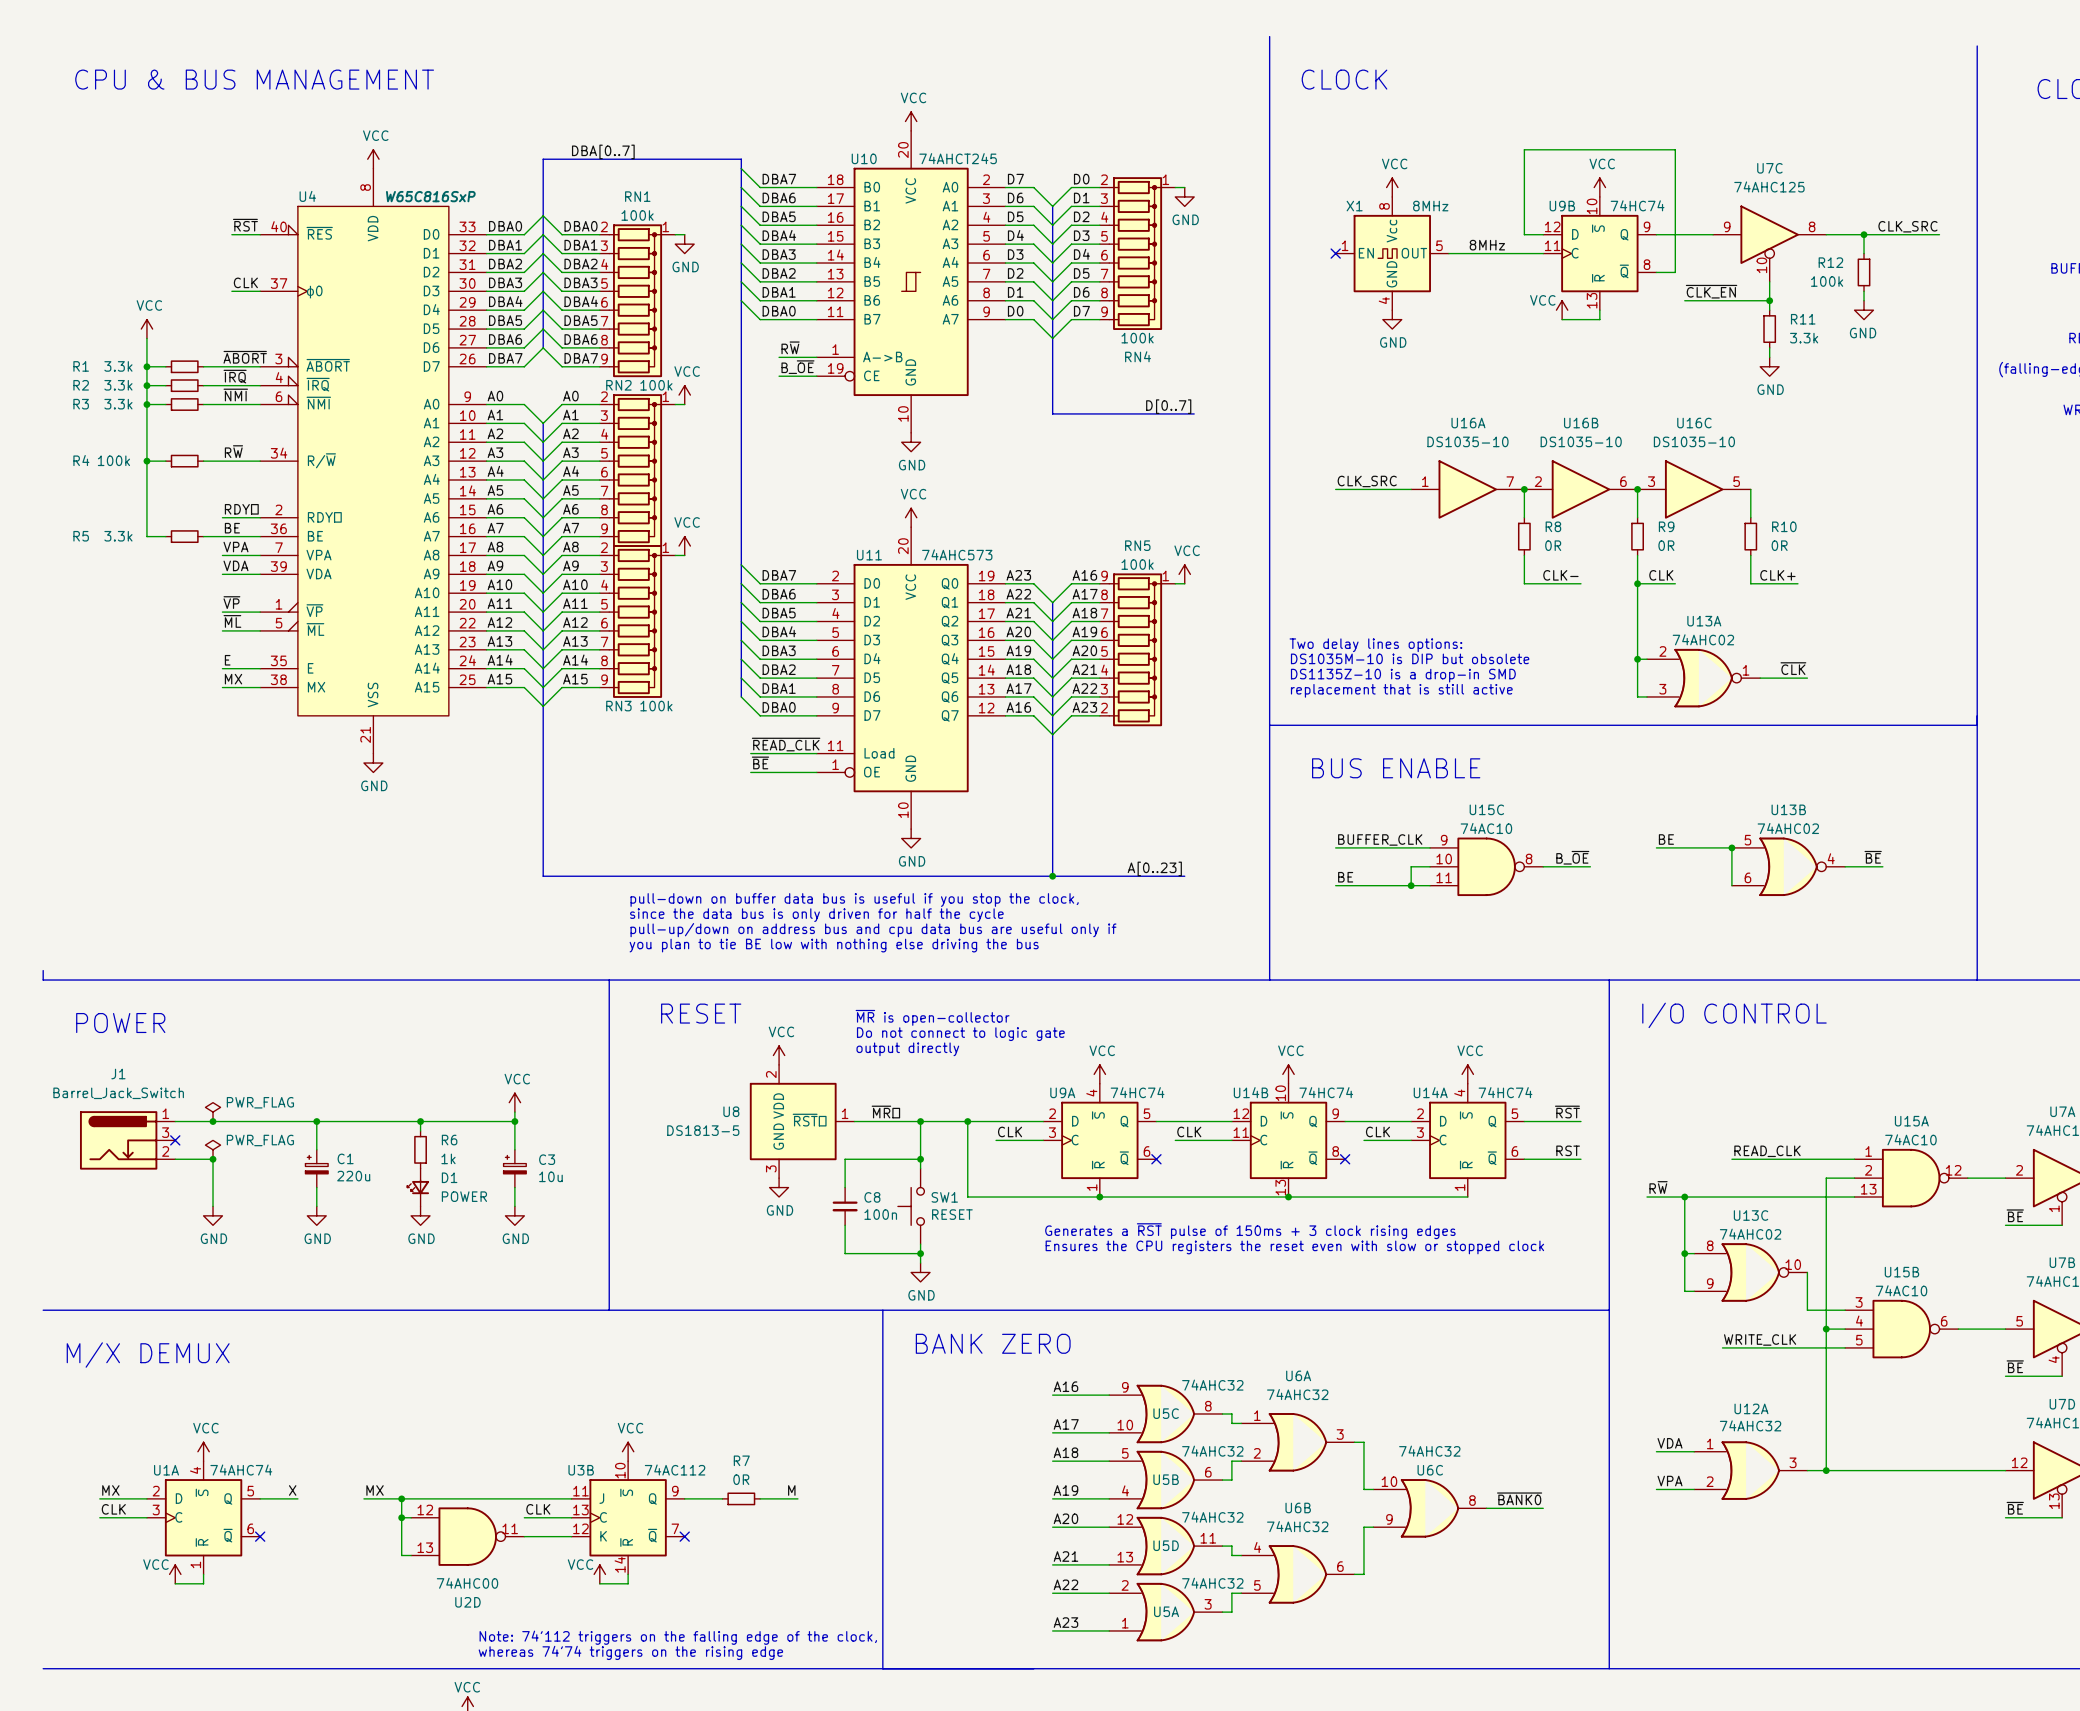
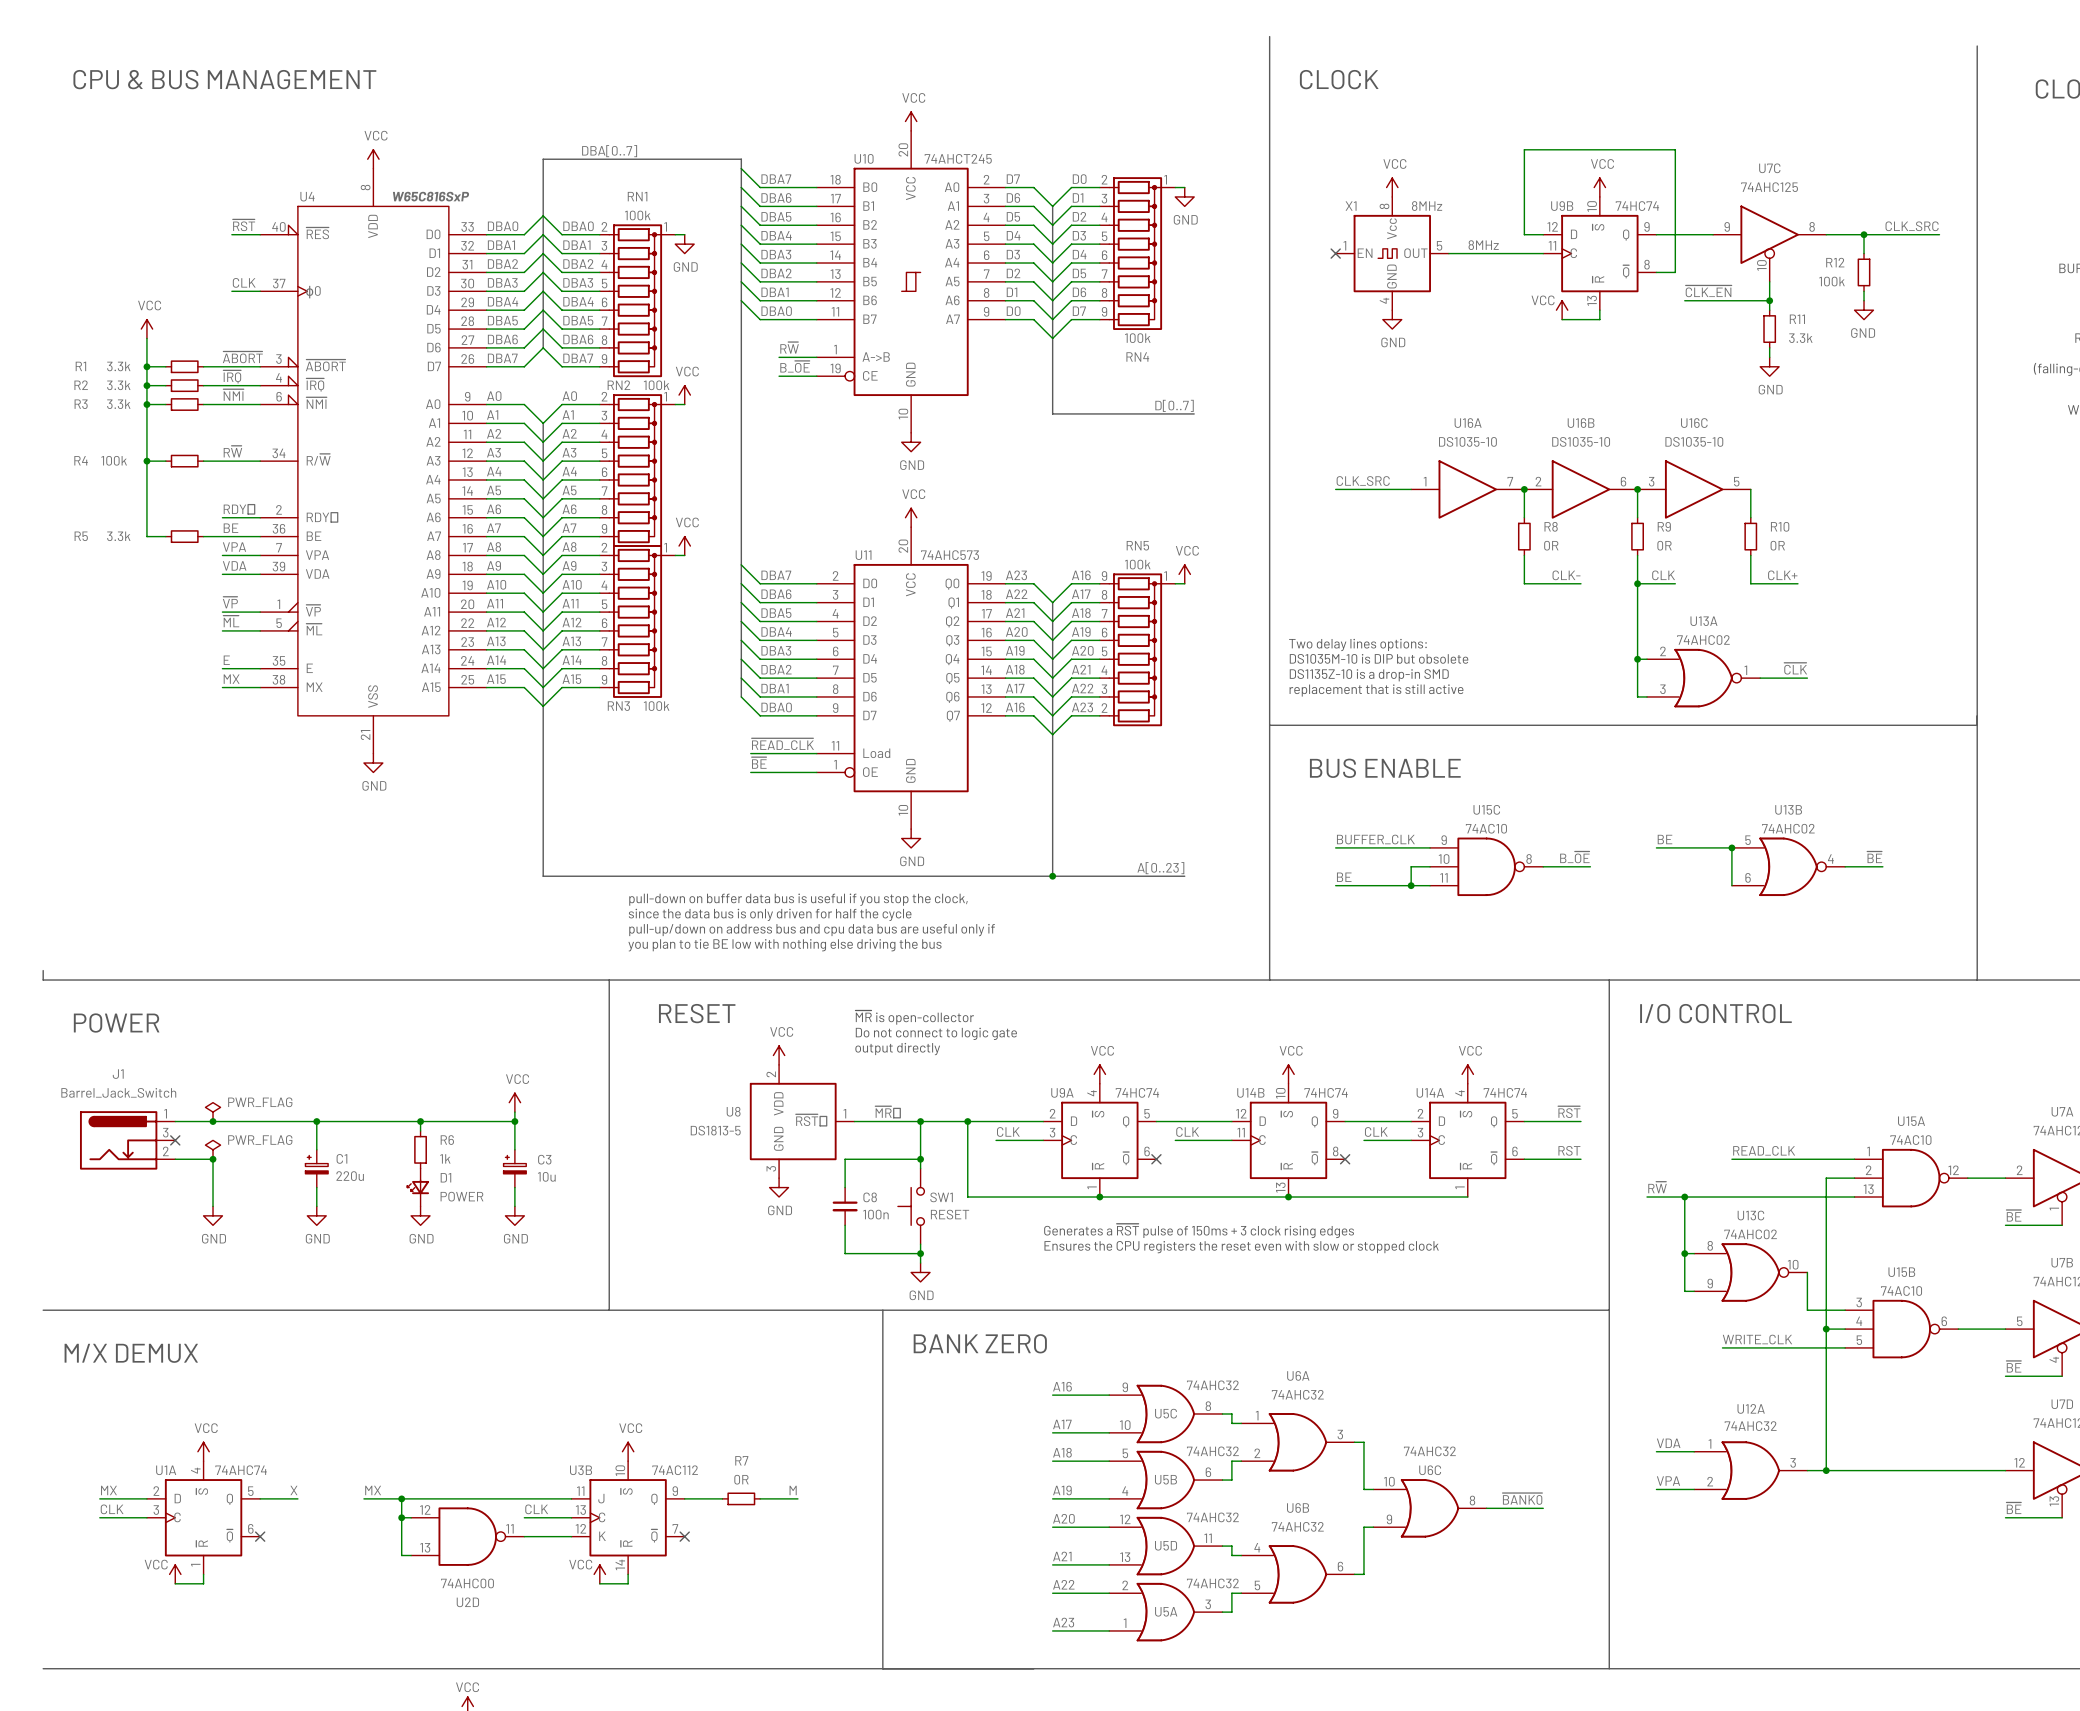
text: Note: 74'112 triggers on the falling edge of the clock, (678, 1637) -> none
text: whereas 74'74 triggers on the rising edge (630, 1652) -> none

